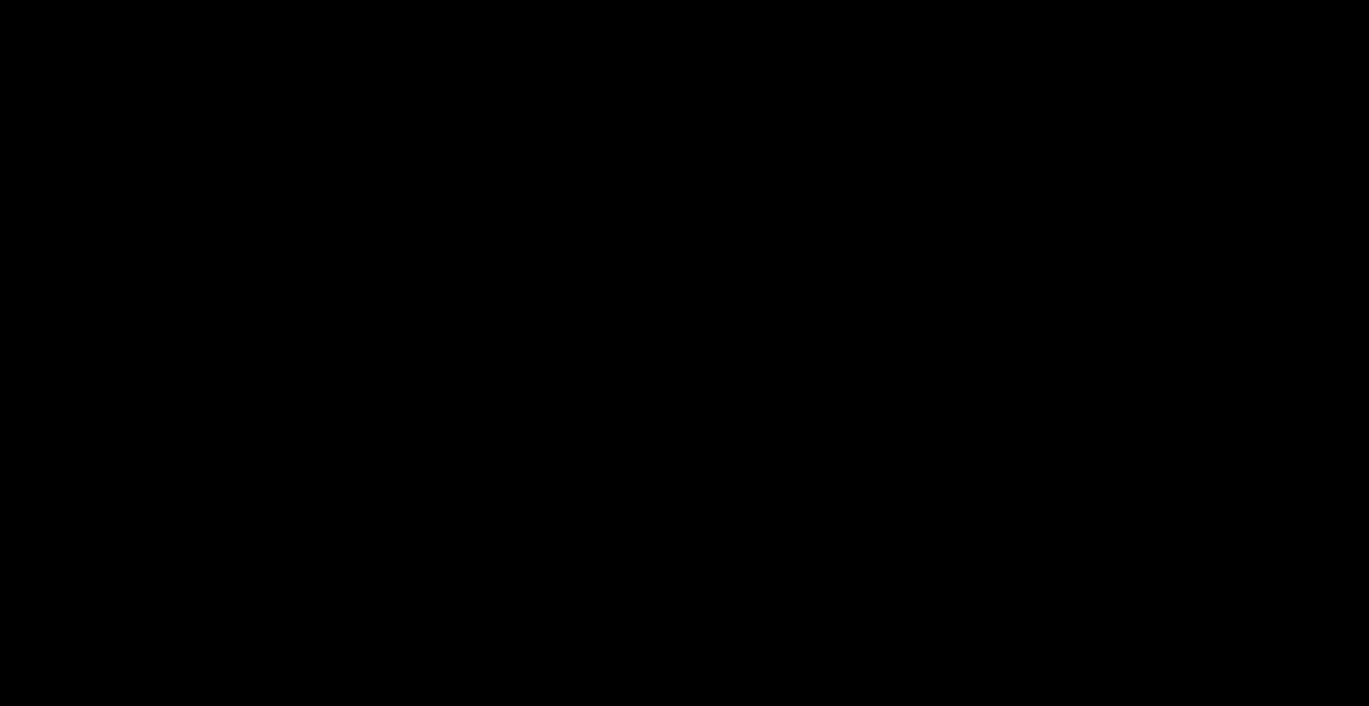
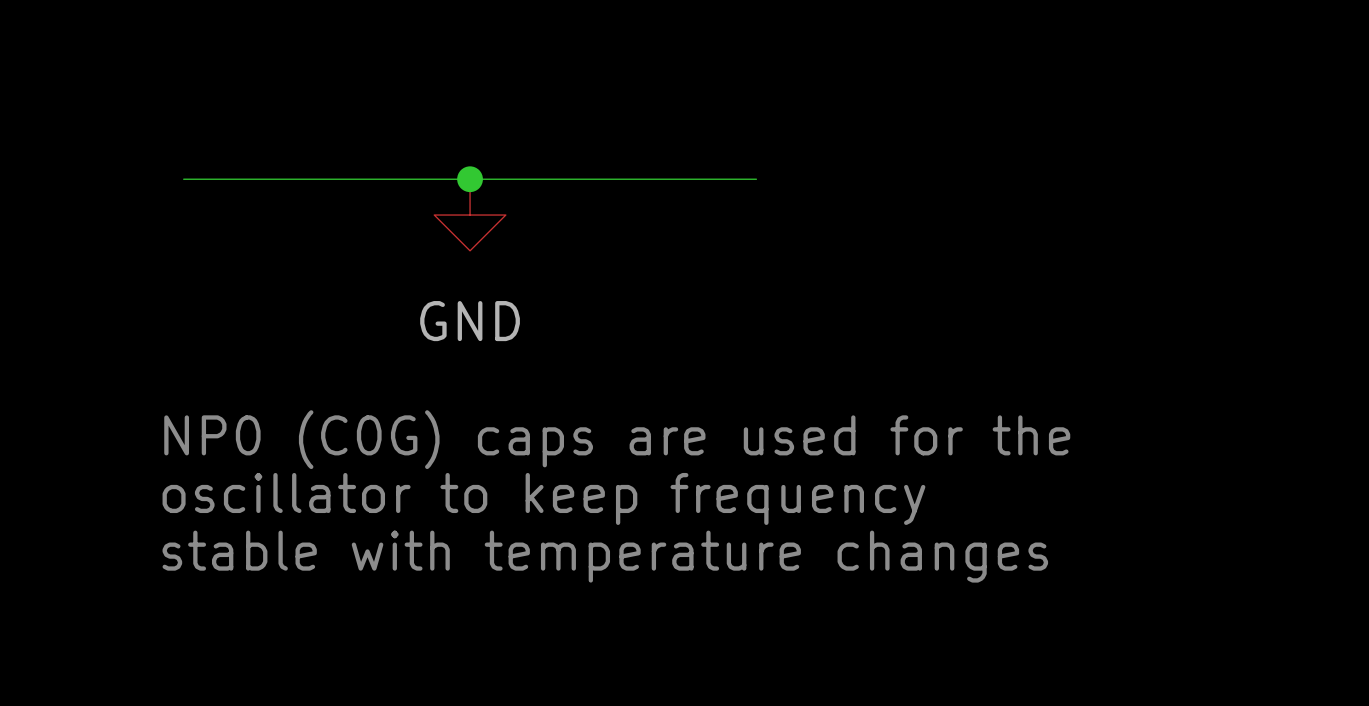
wire: none -> (183, 179) (756, 179)
junction: none -> (470, 179)
power symbol: none -> GND (470, 215)
text: none -> NP0 (C0G) caps are used for the (617, 439)
text: none -> oscillator to keep frequency (543, 498)
text: none -> stable with temperature changes (605, 556)

